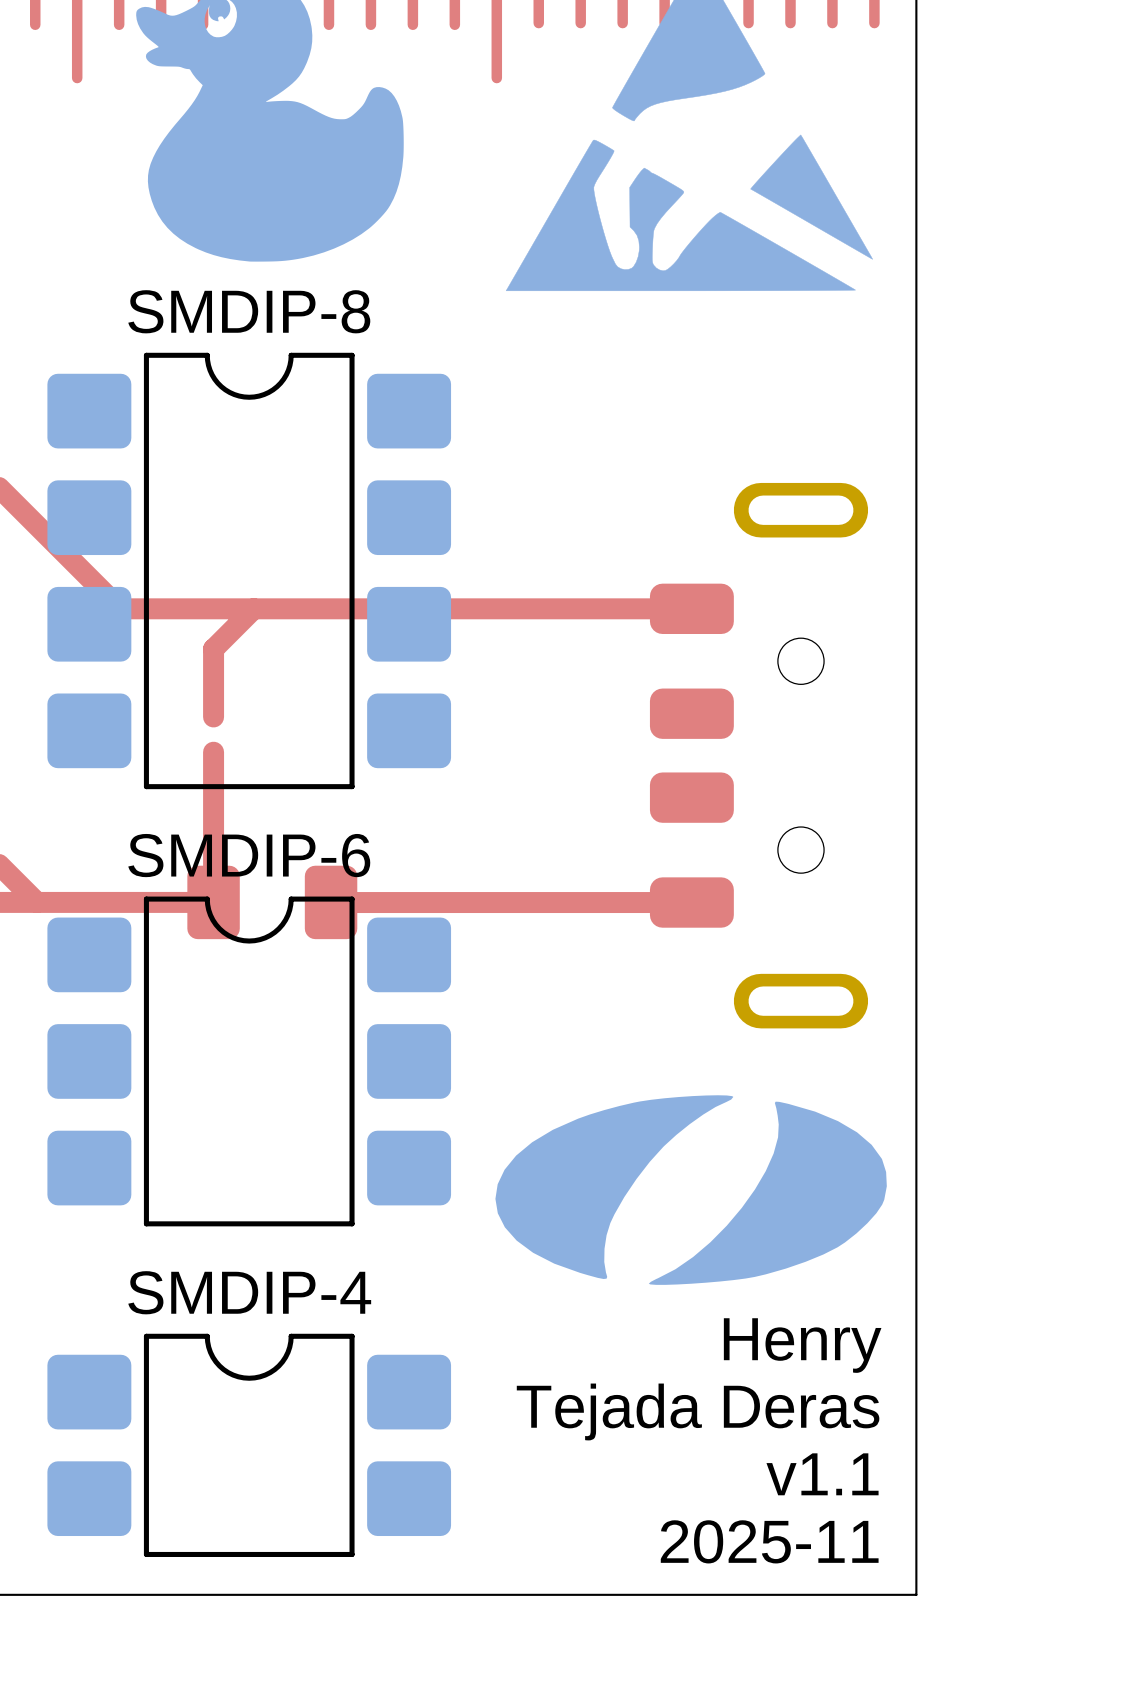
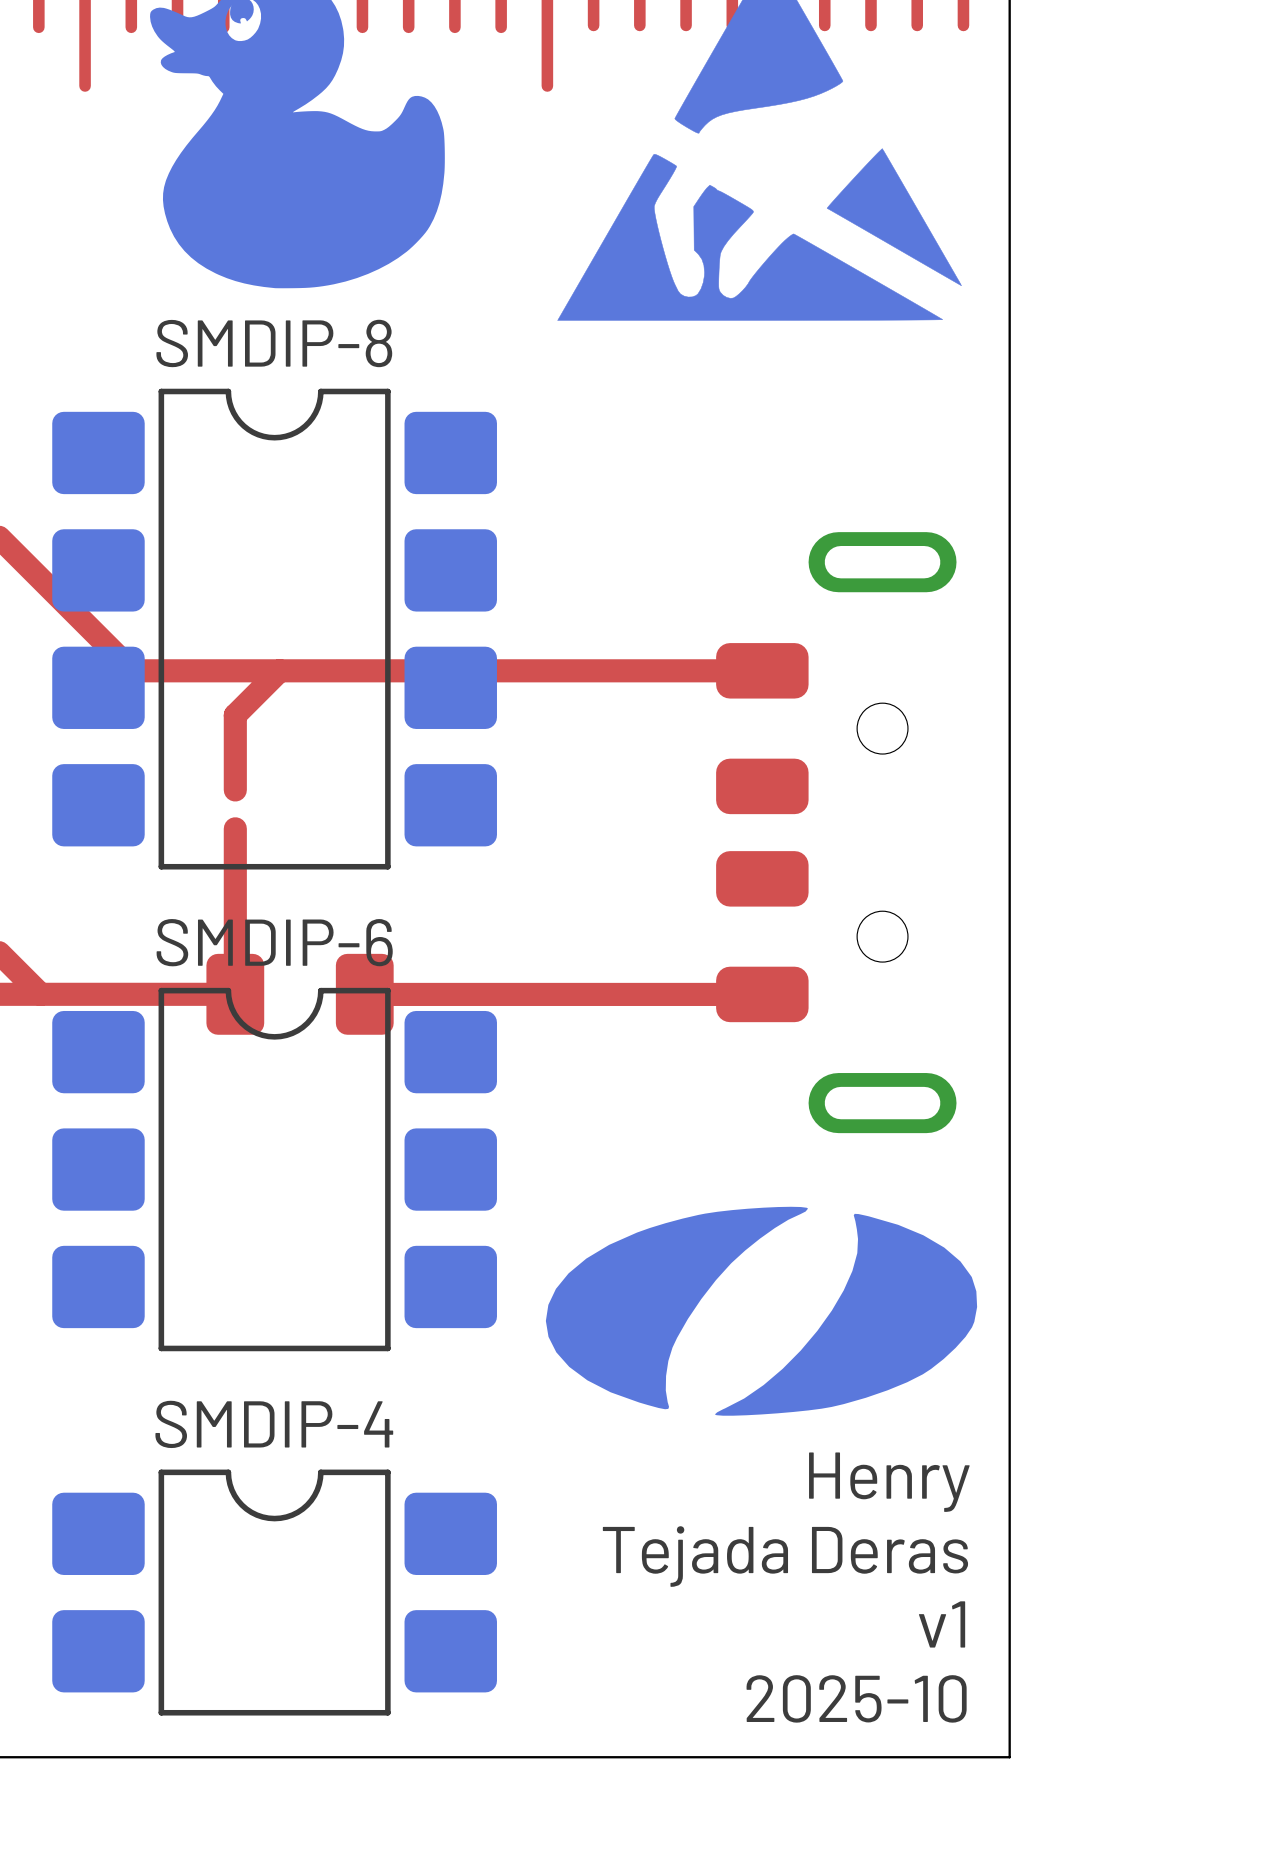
text: v1.1 (822, 1474) -> v1 (942, 1624)
text: 2025-11 (769, 1541) -> 2025-10 (856, 1698)

